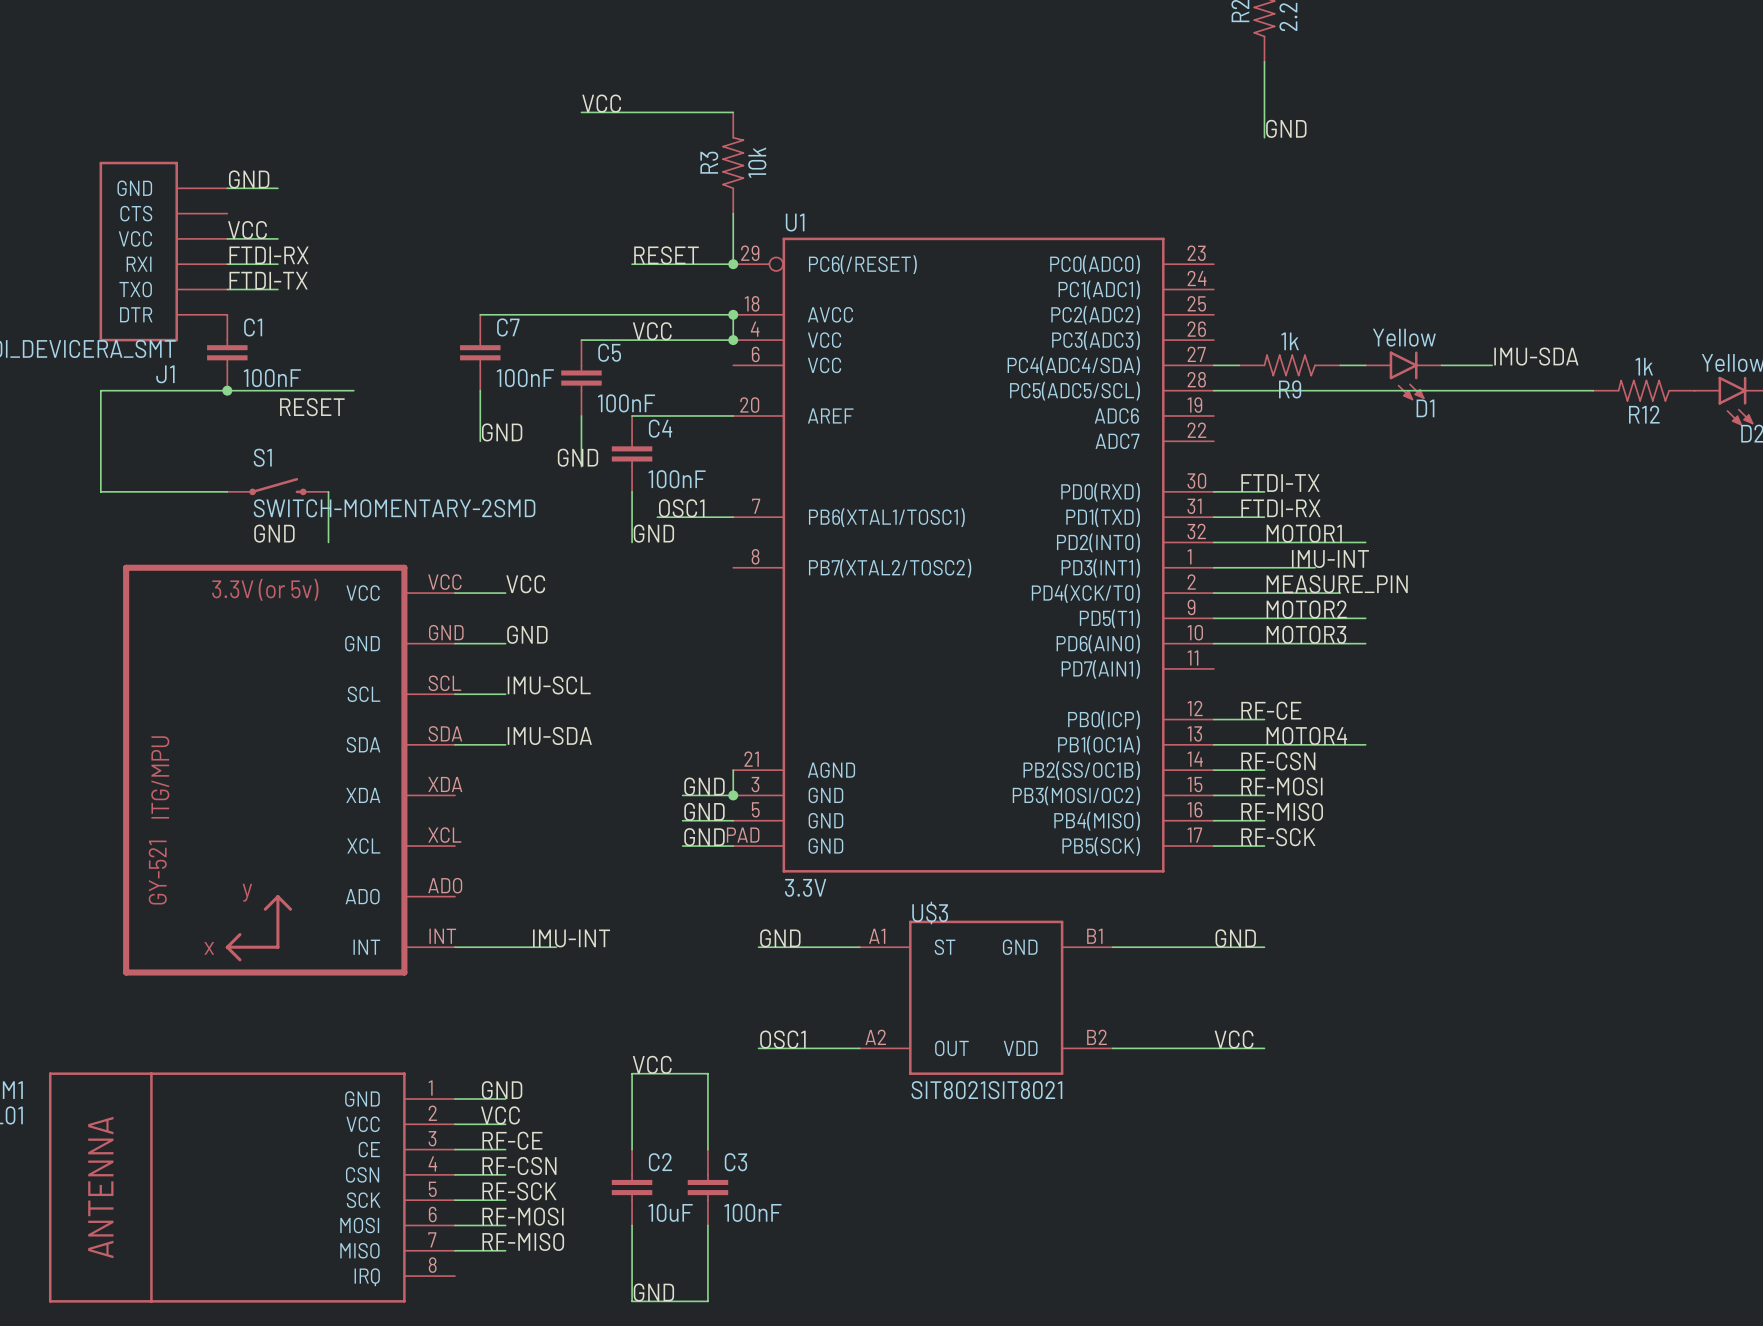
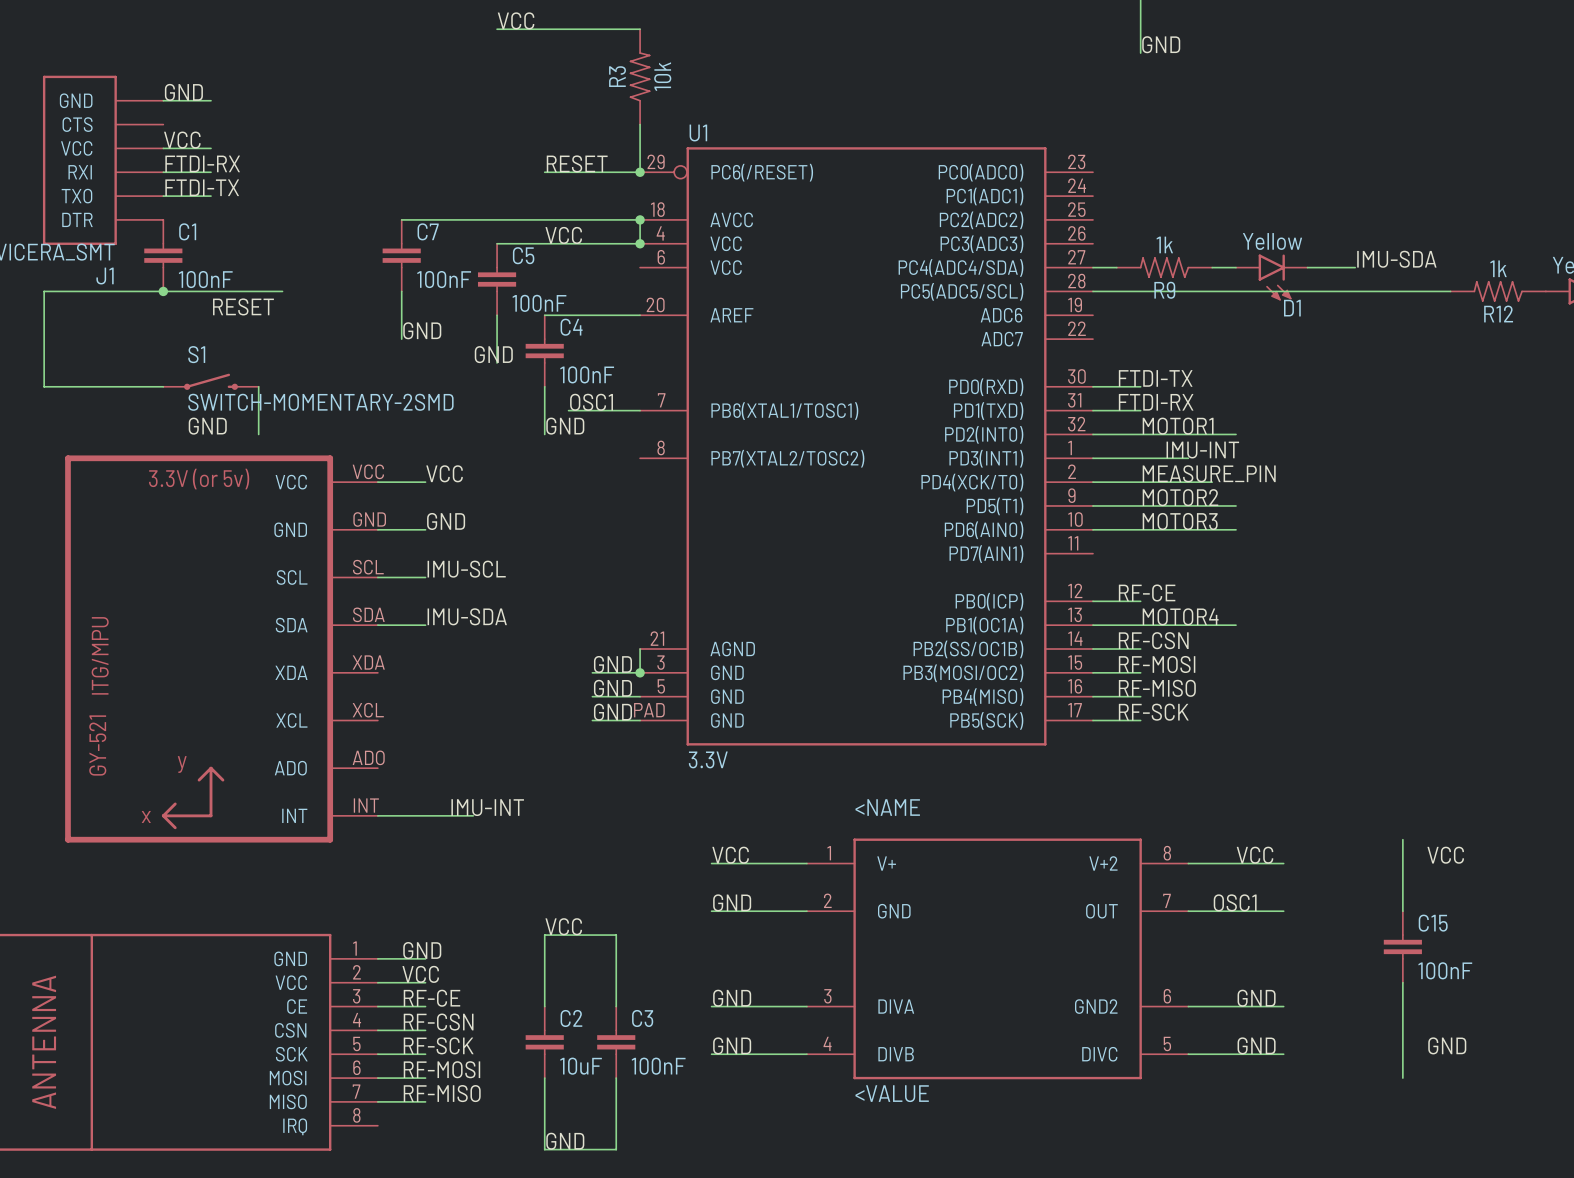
label: GND (780, 938) -> none
label: GND (1235, 938) -> none
wire: (758, 947) (859, 947) -> (711, 863) (806, 863)
wire: (1112, 947) (1264, 947) -> none
wire: none -> (1402, 839) (1402, 911)
label: none -> VCC (730, 855)
label: none -> VCC (1445, 855)
U$3: SIT8021SIT8021 (986, 997) -> none
wire: none -> (1188, 863) (1283, 863)
label: OSC1 (782, 1039) -> none
label: none -> GND (732, 902)
label position: VCC (1234, 1039) -> VCC (1255, 855)
label: none -> OSC1 (1235, 902)
wire: (1112, 1048) (1264, 1048) -> none
wire: none -> (1188, 911) (1283, 911)
C15: none -> 100nF (1402, 946)
part: none -> (997, 958)
wire: none -> (1402, 982) (1402, 1078)
label: none -> GND (732, 998)
label: none -> GND (1256, 998)
wire: none -> (711, 1006) (806, 1006)
wire: none -> (1188, 1006) (1283, 1006)
label: none -> GND (732, 1045)
label: none -> GND (1256, 1045)
label: none -> GND (1447, 1045)
wire: none -> (711, 1054) (806, 1054)
wire: none -> (1188, 1054) (1283, 1054)

